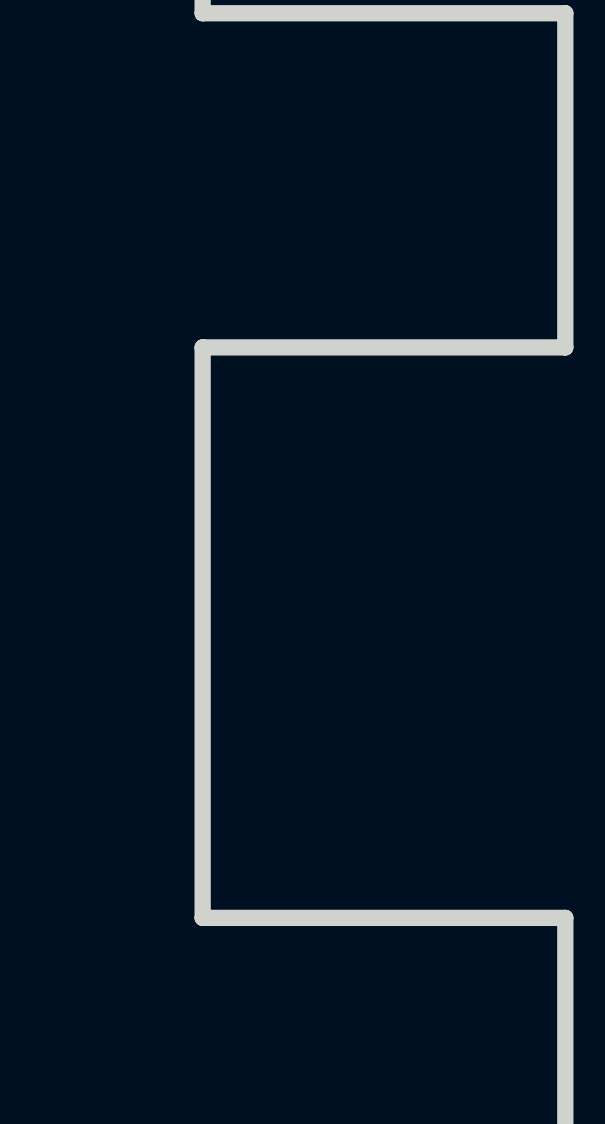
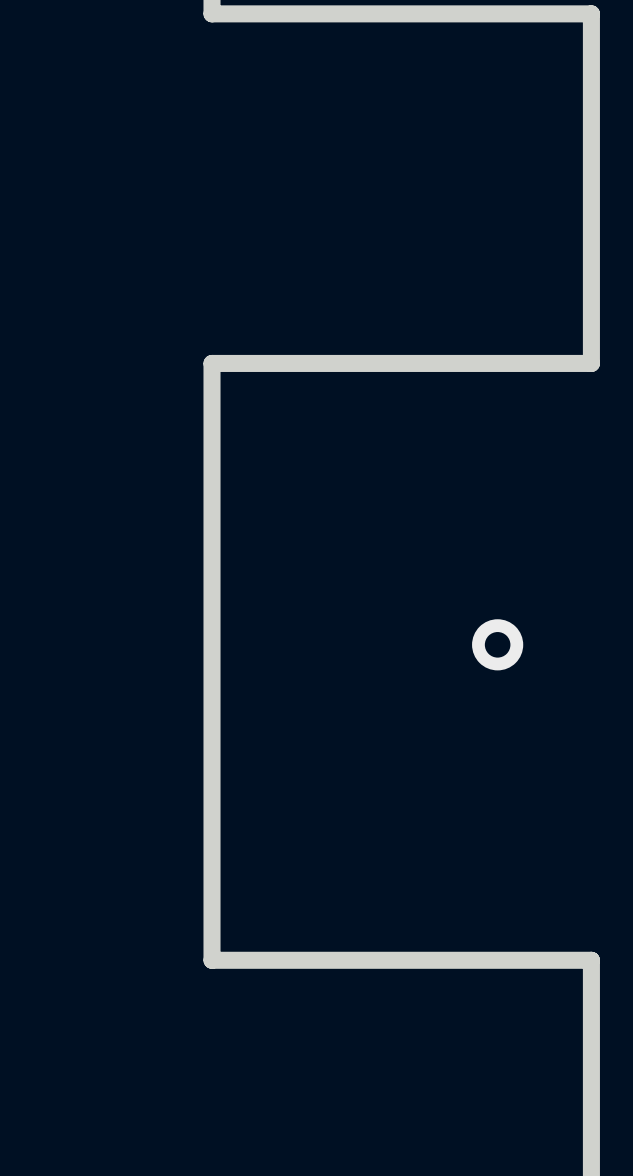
via: none -> (497, 644)

